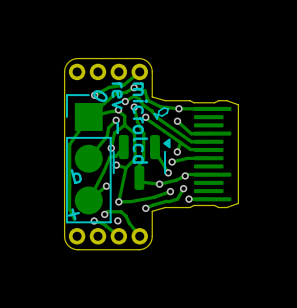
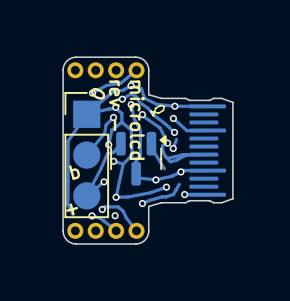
track: (157, 117) (191, 141) (208, 141) -> (153, 114) (174, 132)
track: (163, 130) (190, 149) (208, 150) -> (160, 127) (167, 141) (162, 145) (162, 151) (170, 161) (187, 154) (203, 154)
via: none -> (174, 132)
via: none -> (167, 143)
via: (172, 162) -> none
via: (168, 172) -> none
via: (183, 188) -> none

